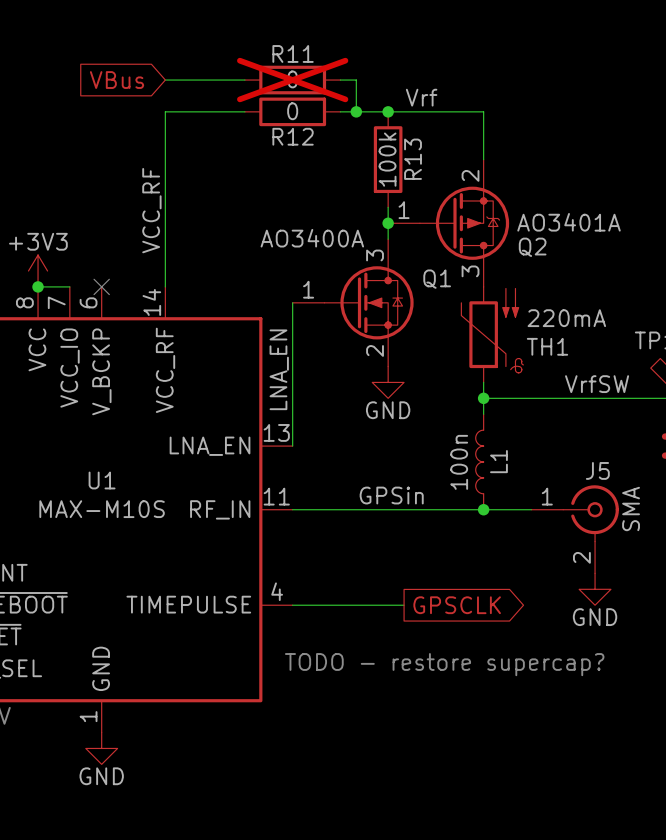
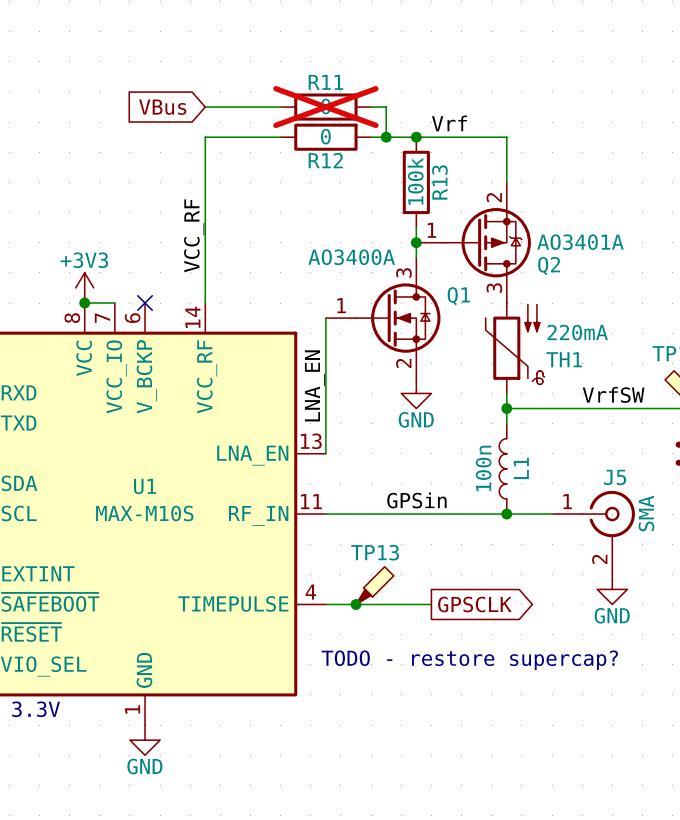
TP13: none -> (374, 585)
junction: none -> (356, 604)

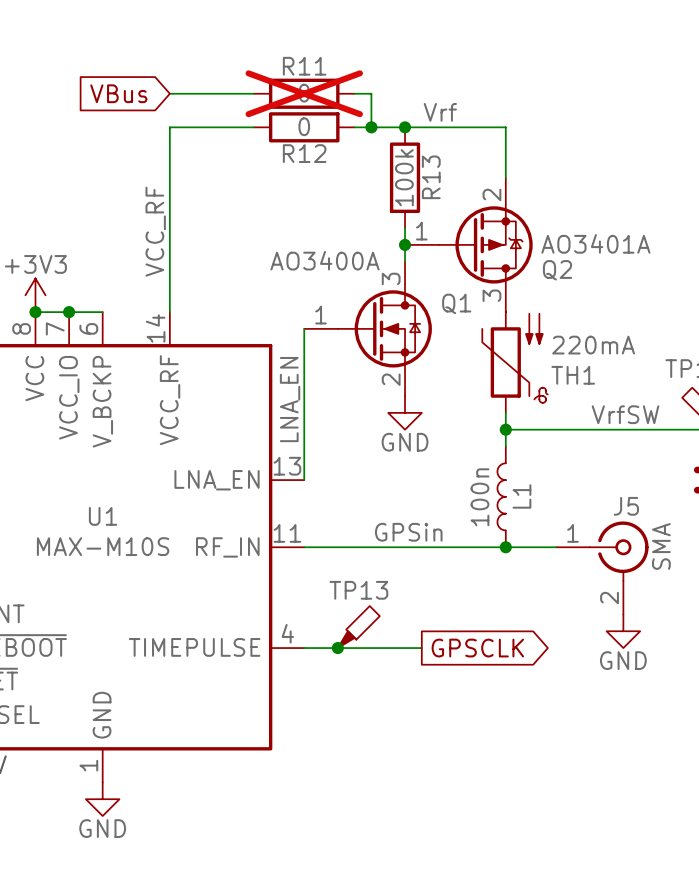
wire: none -> (69, 312) (102, 312)
junction: none -> (69, 312)
no-connect mark: (145, 303) -> none
text: TODO - restore supercap? (469, 660) -> none

